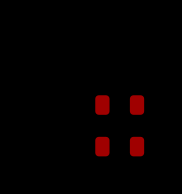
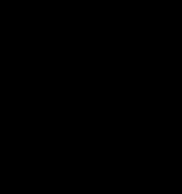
part: (119, 105) -> none
part: (119, 146) -> none

